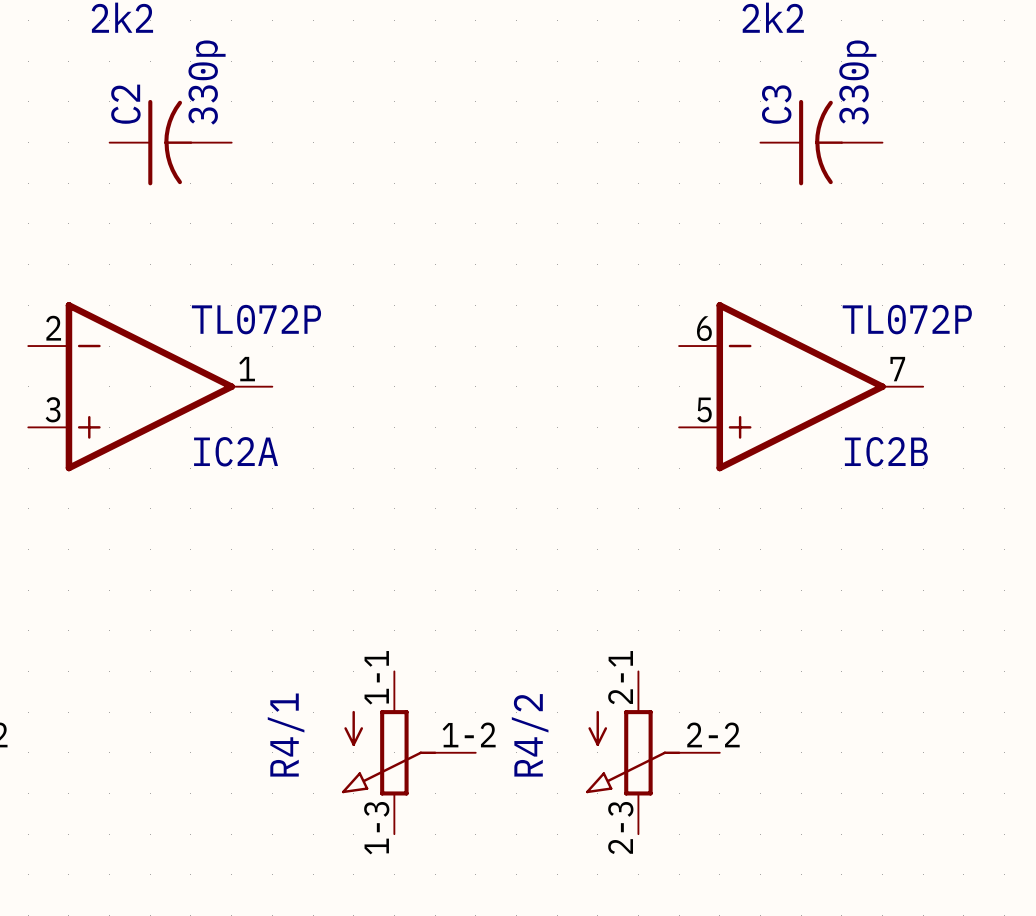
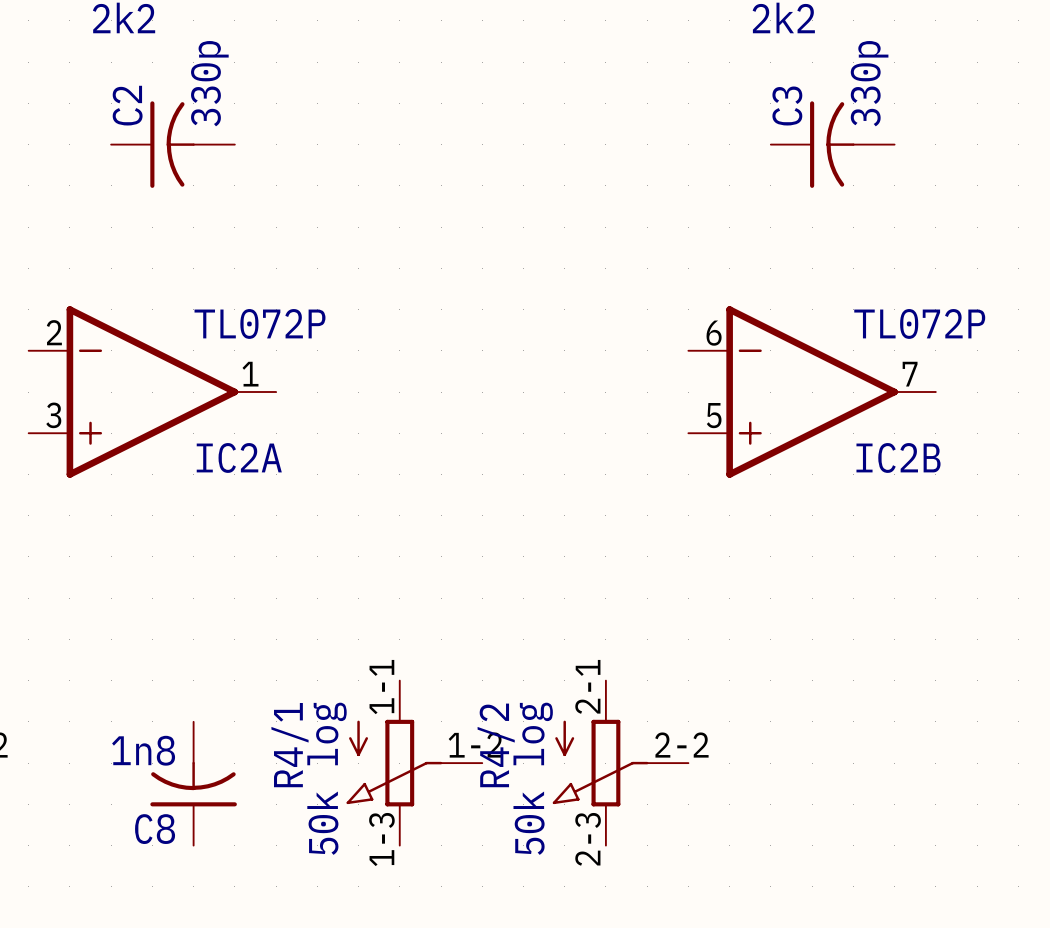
R4/2 position: (652, 752) -> (620, 763)
R4/1 value: none -> 50k log (327, 778)
R4/2 value: none -> 50k log (533, 778)
C8: none -> 1n8 (193, 783)

